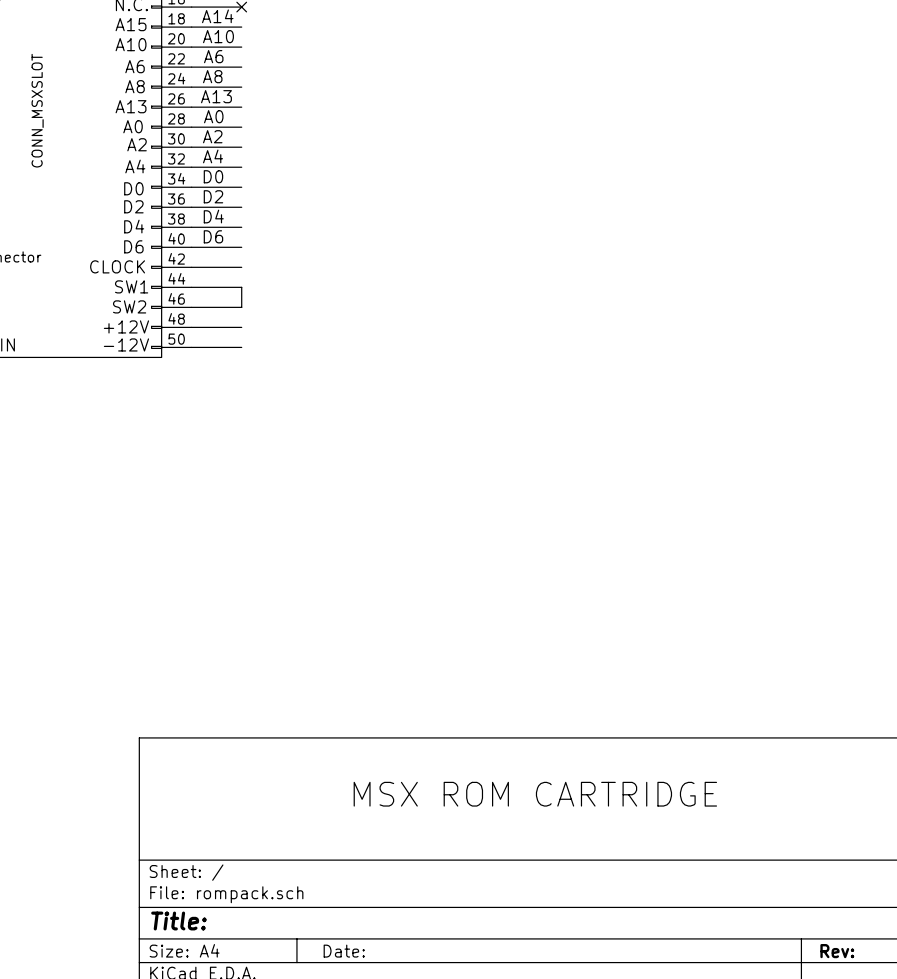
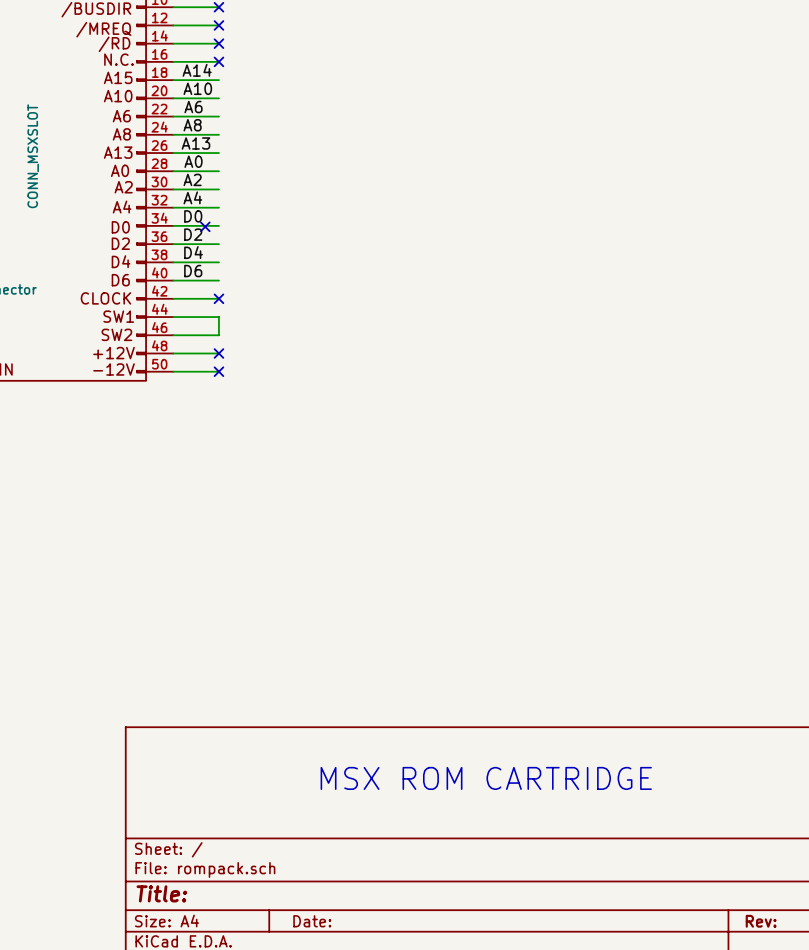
no-connect mark: none -> (205, 226)
no-connect mark: none -> (218, 298)
no-connect mark: none -> (218, 353)
no-connect mark: none -> (218, 371)

